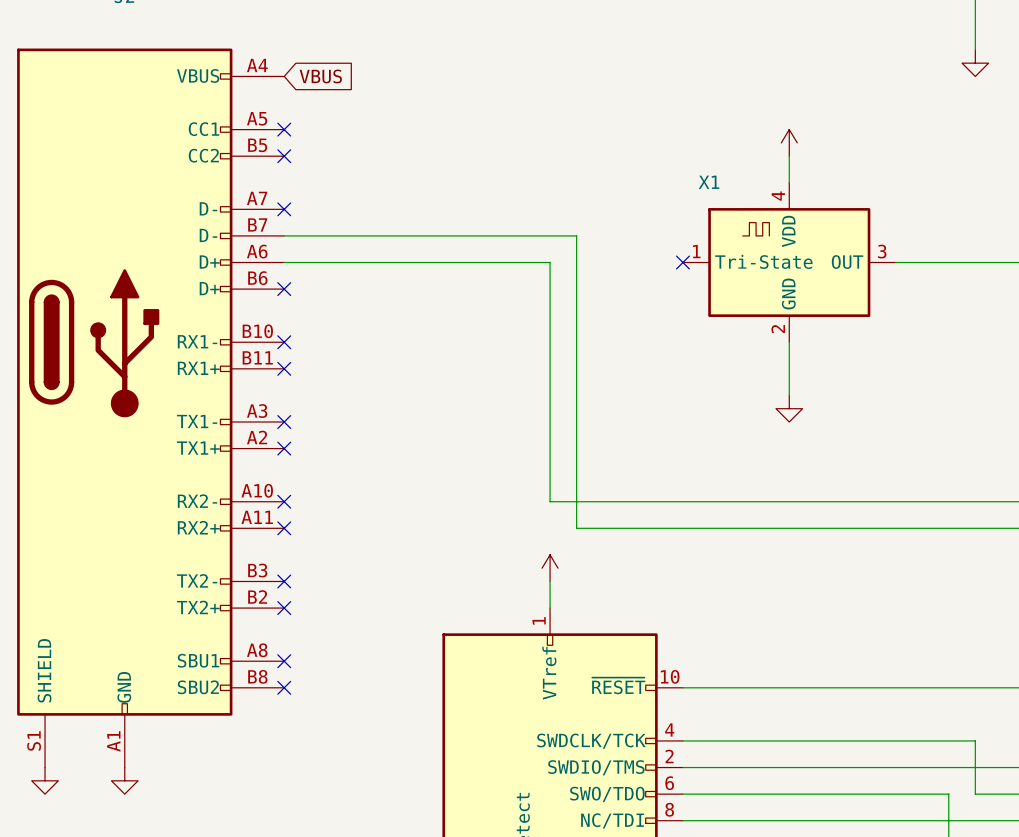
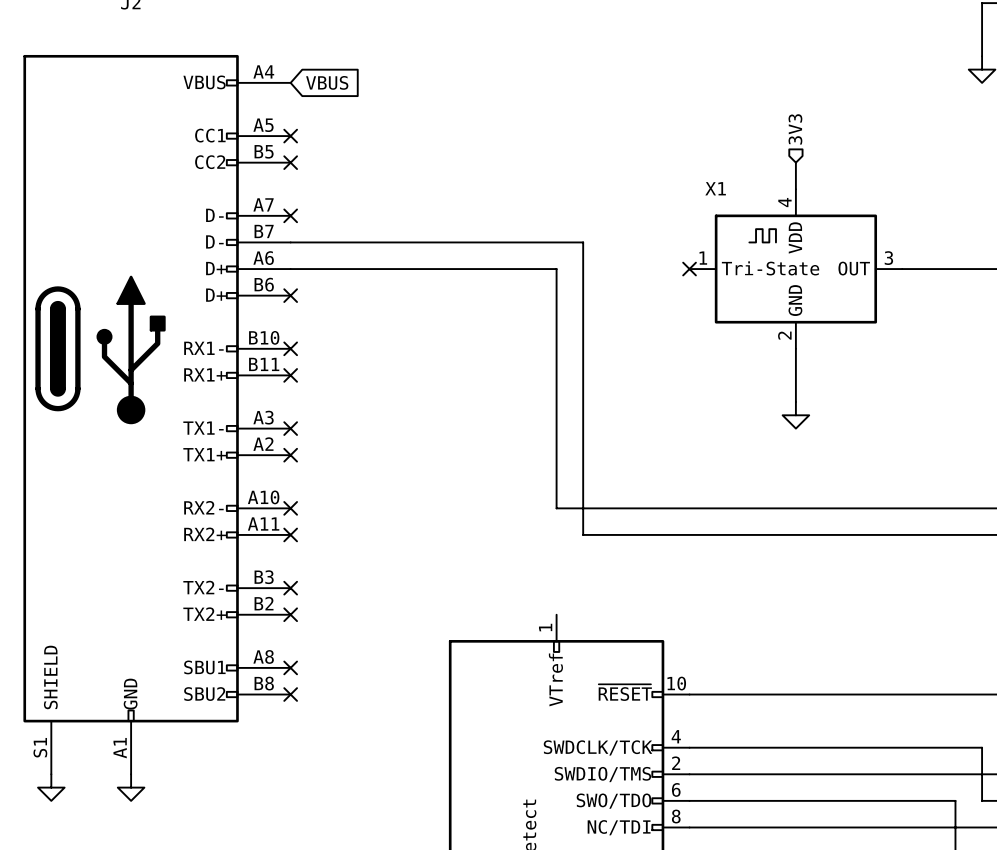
hierarchical label: none -> 3V3 (795, 129)
power symbol: (789, 142) -> none
power symbol: (550, 568) -> none
wire: (550, 581) (550, 608) -> none

